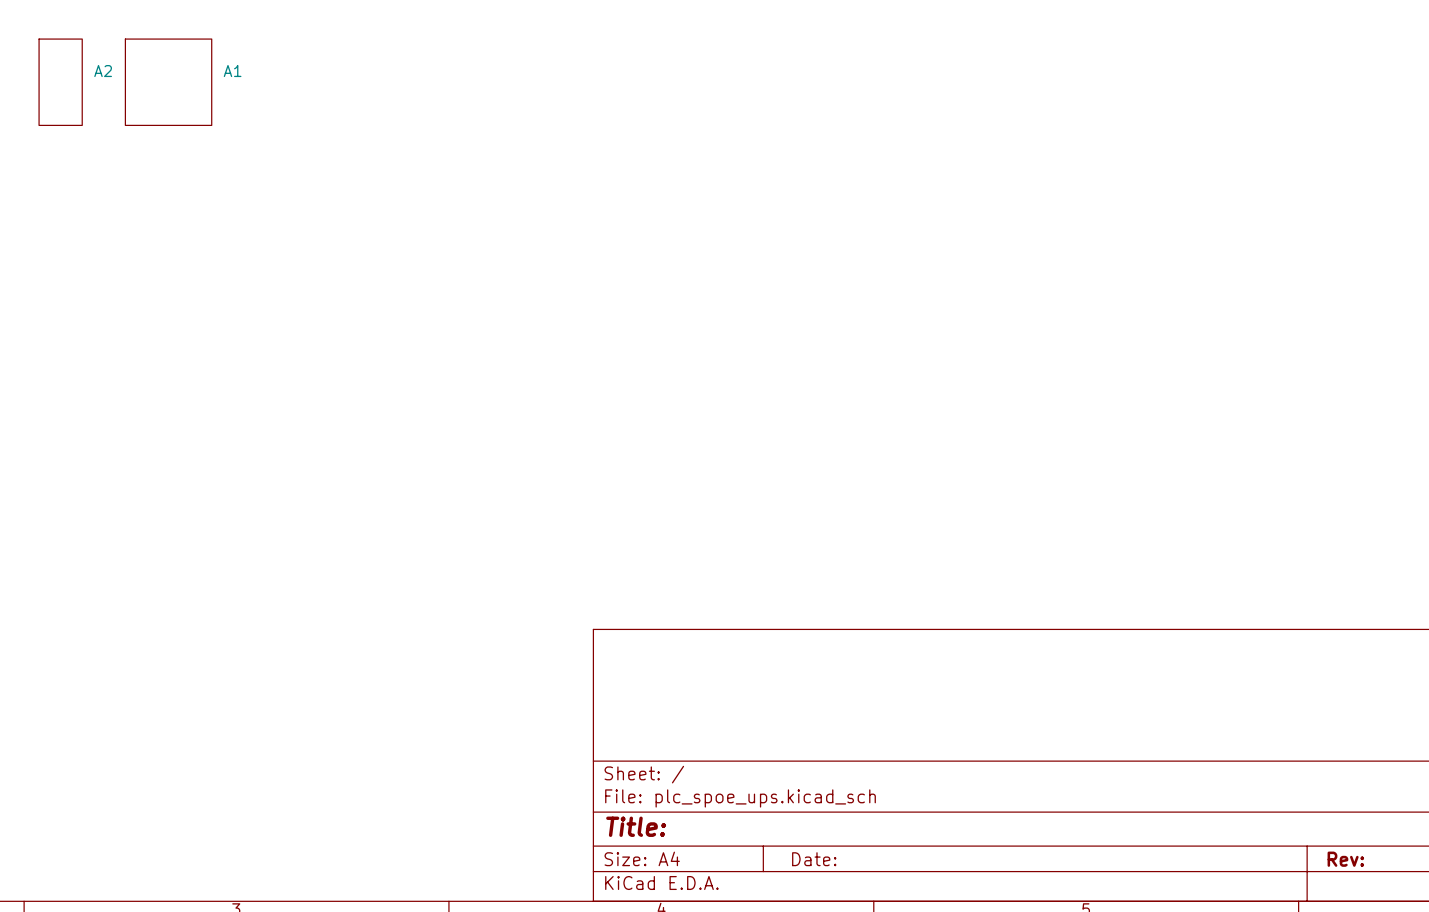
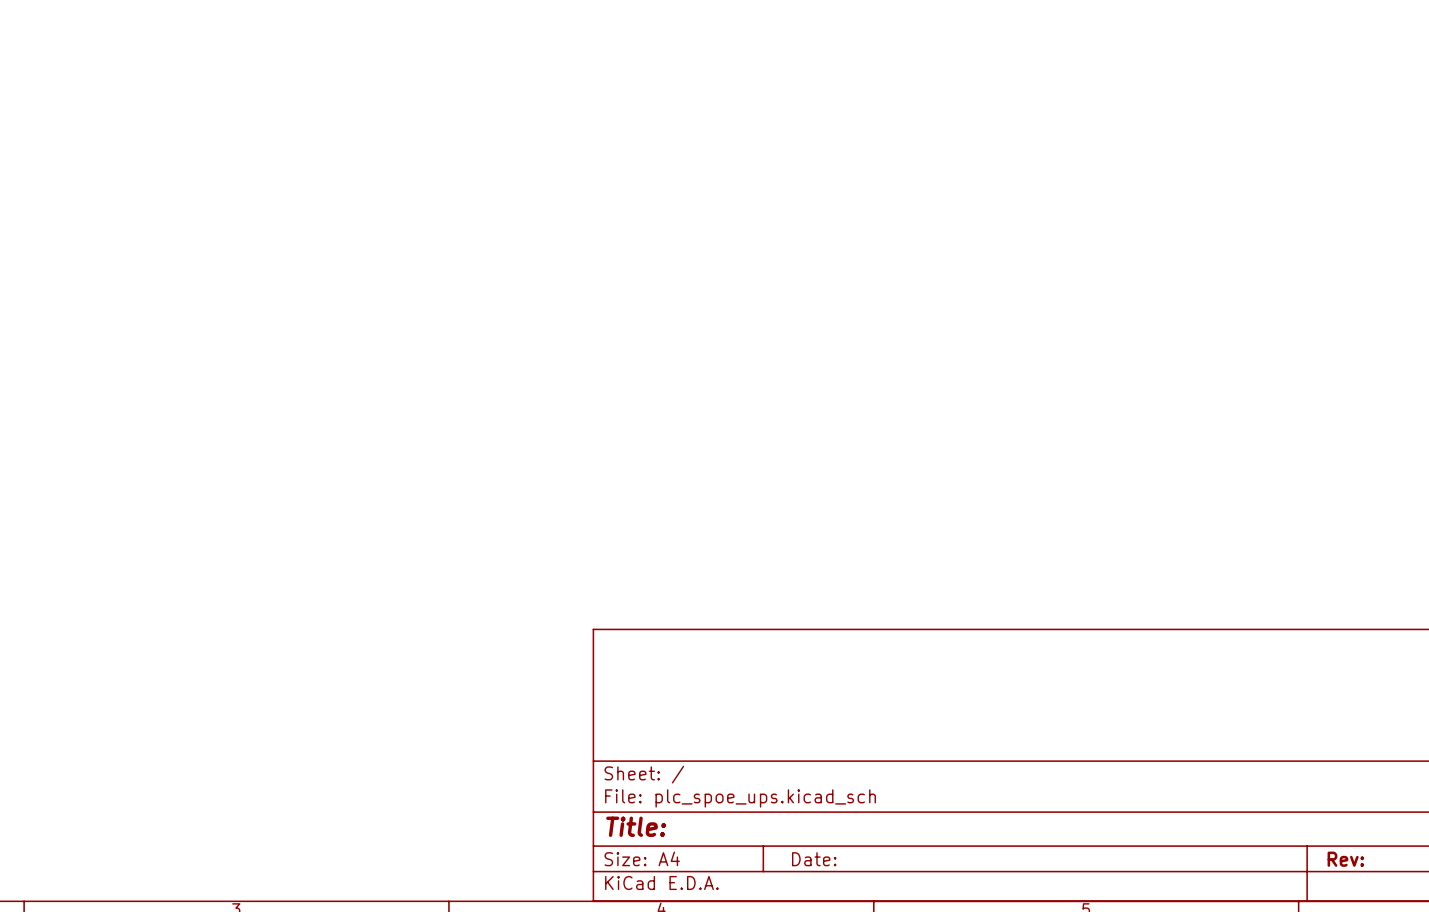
A2: (60, 82) -> none
A1: (168, 82) -> none

